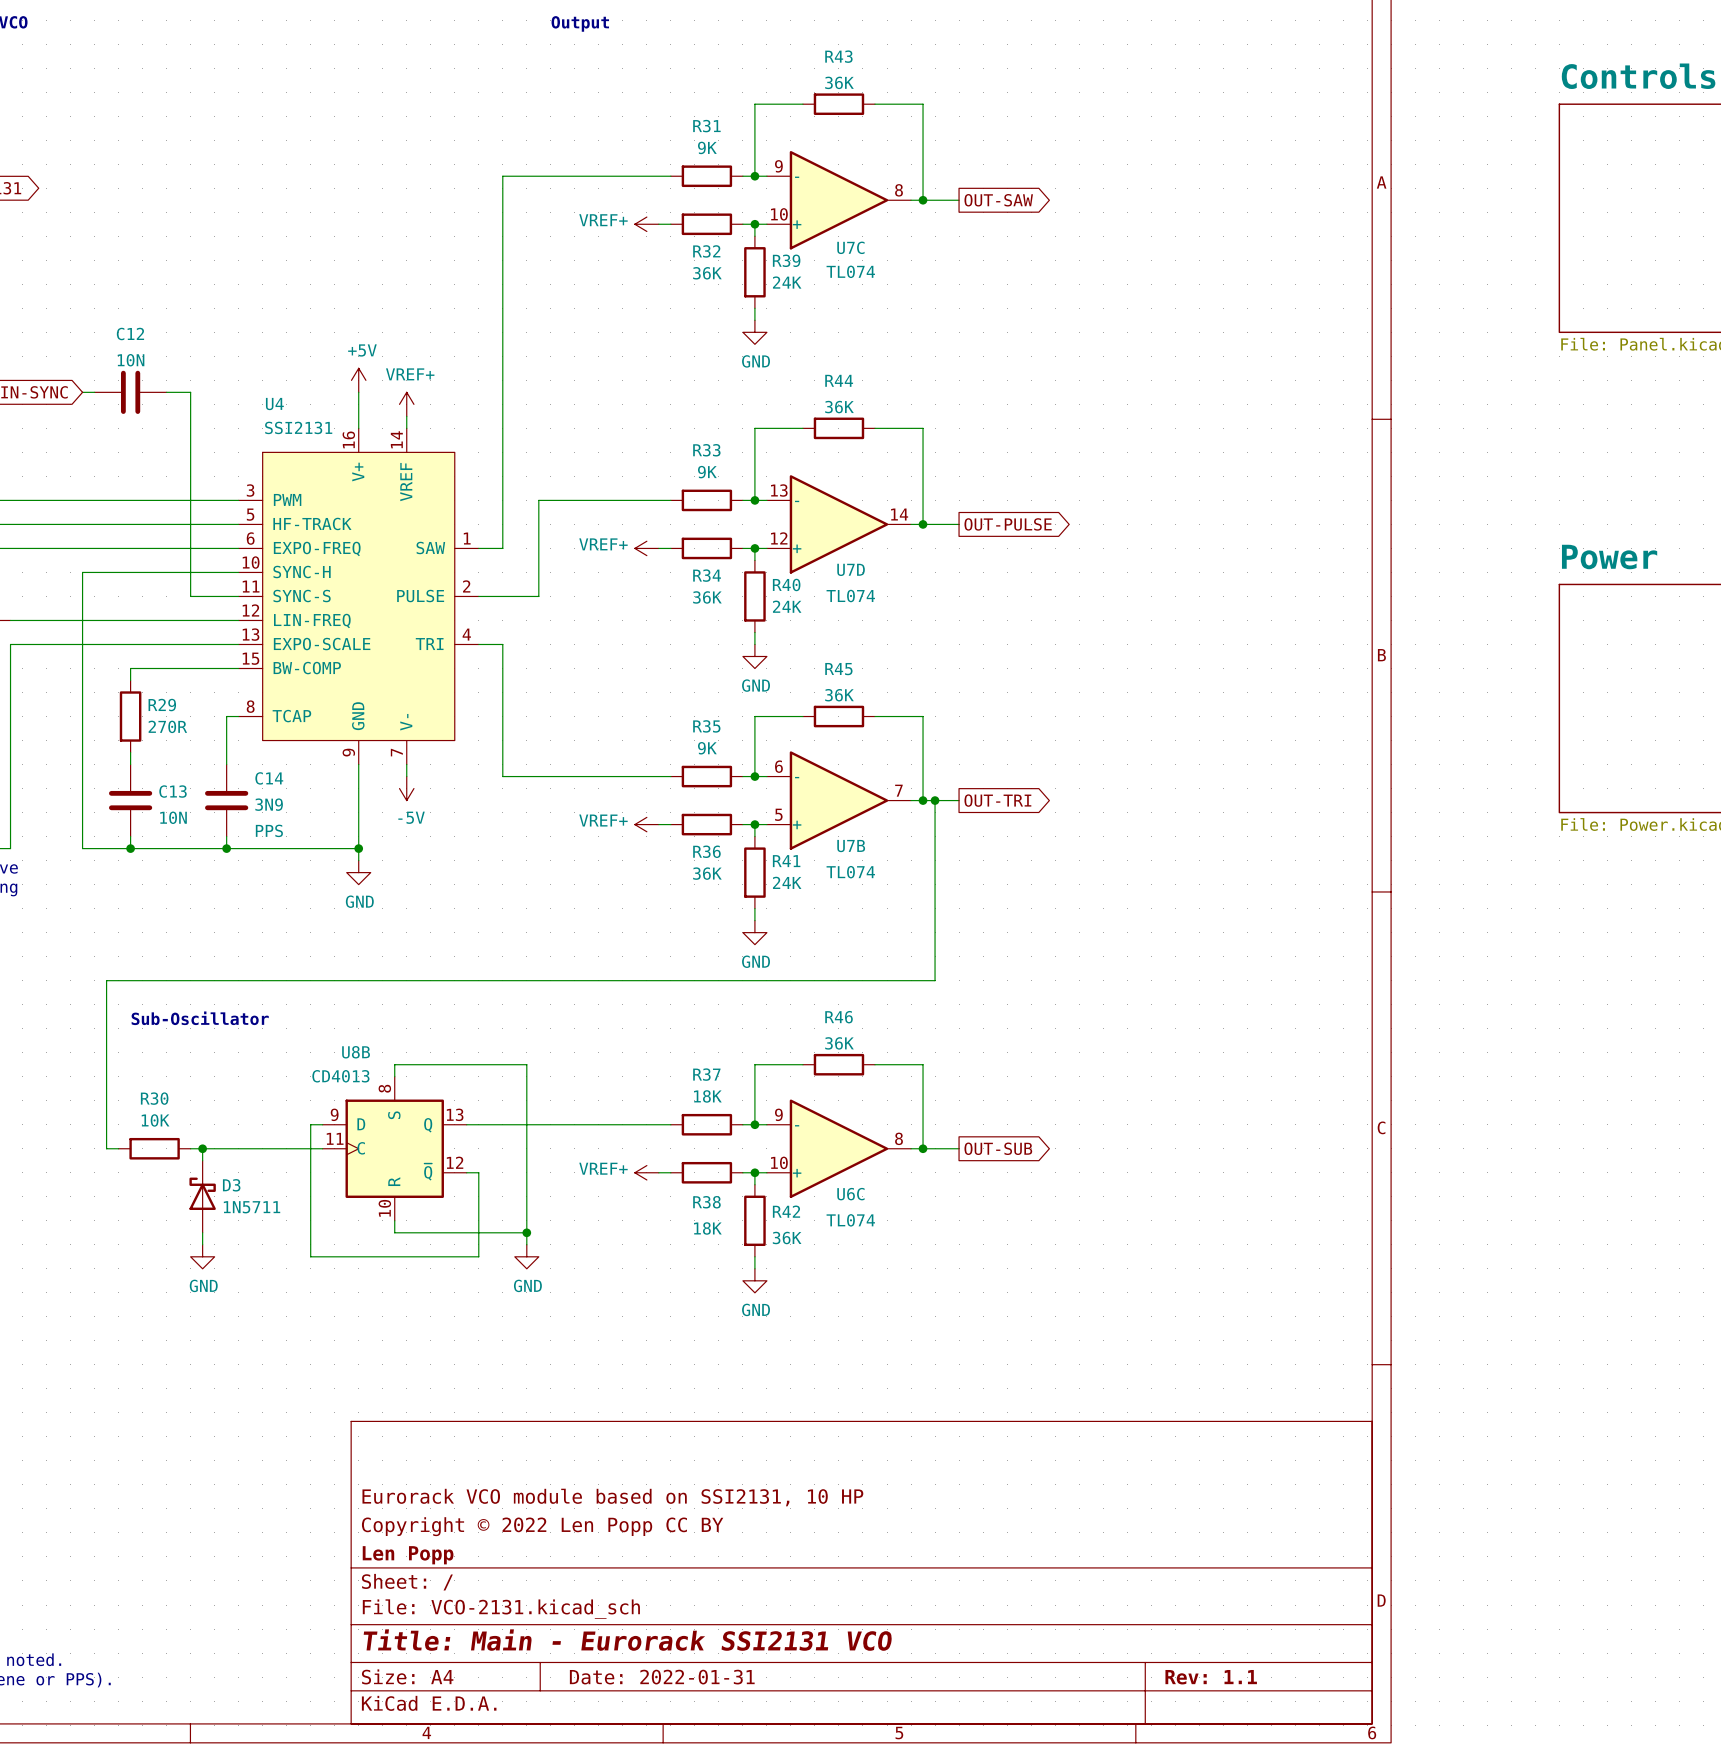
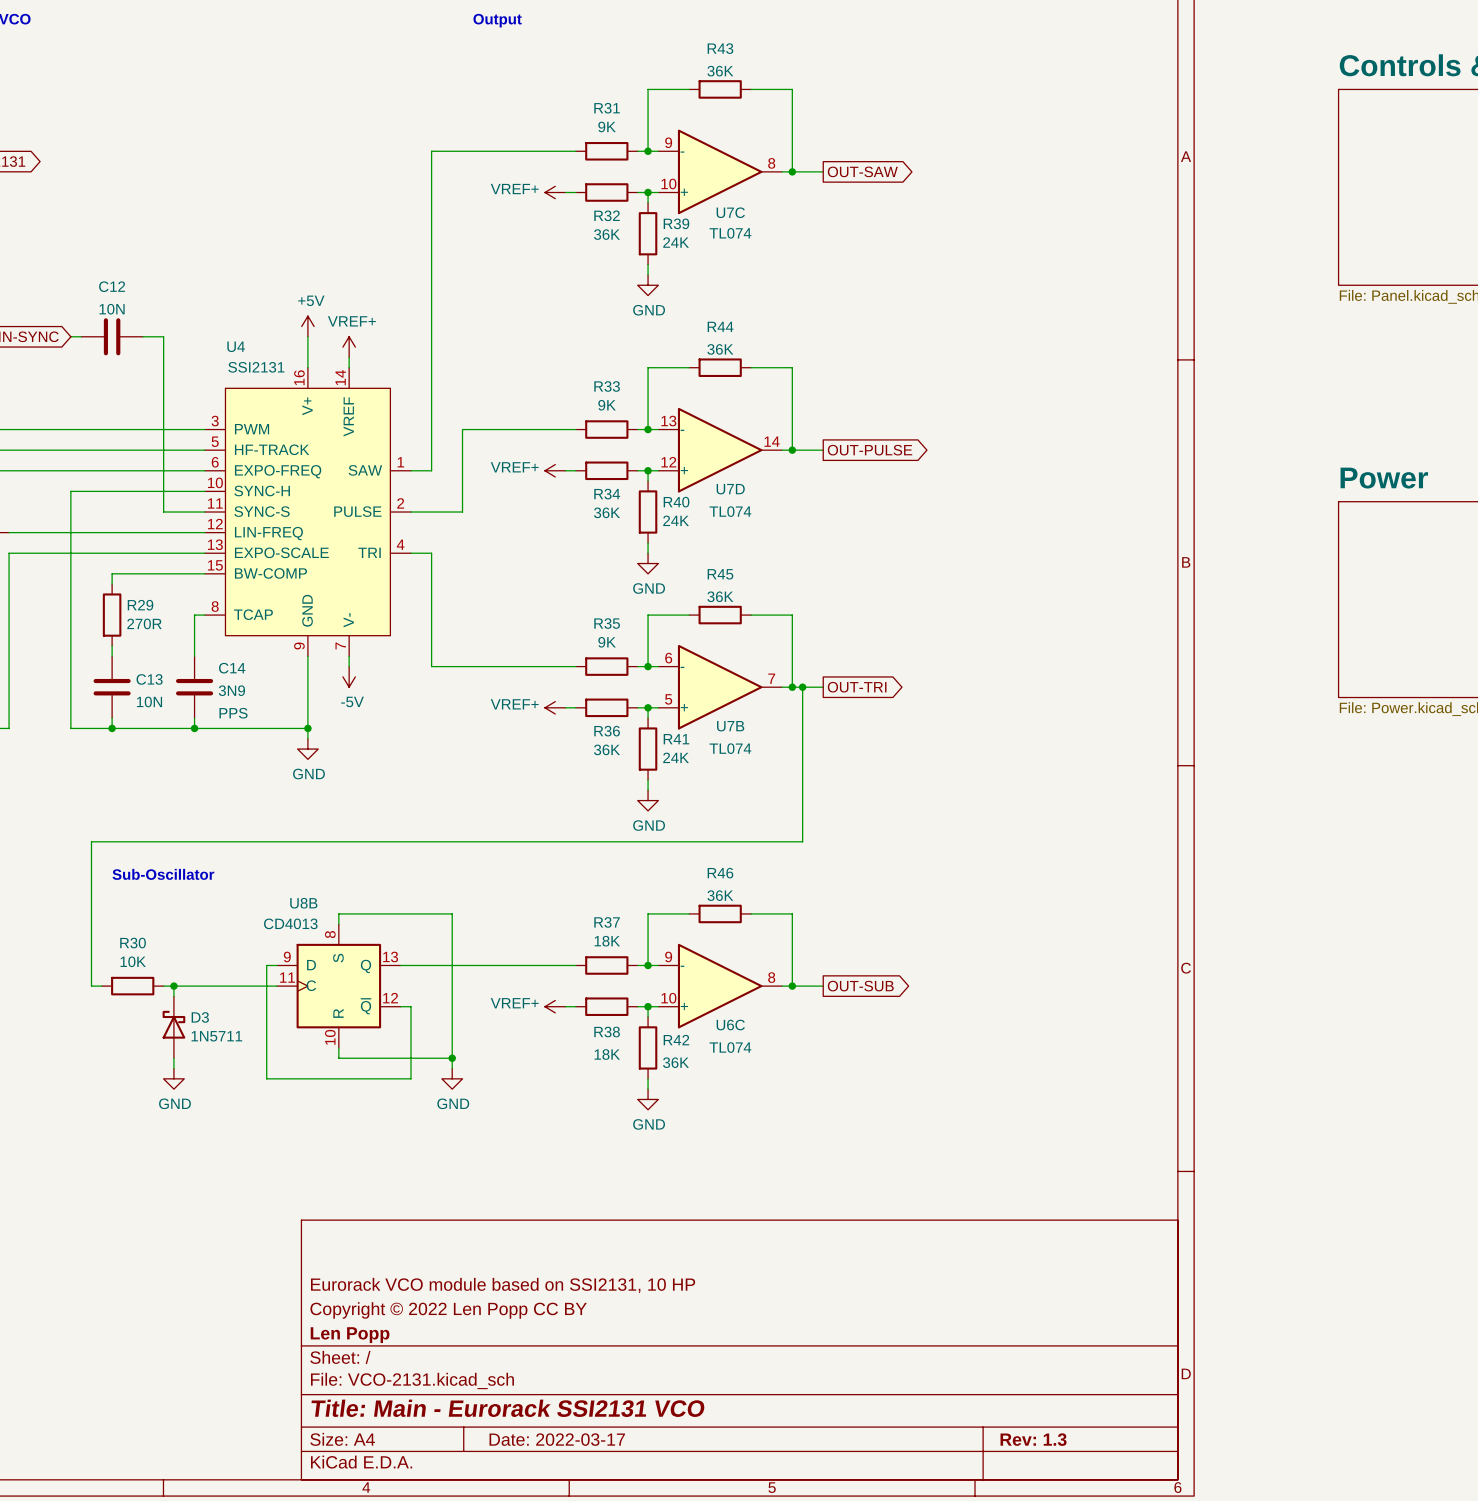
title block: Date: 2022-01-31 (662, 1677) -> Date: 2022-03-17 (557, 1439)
title block: Rev: 1.1 (1211, 1677) -> Rev: 1.3 (1033, 1439)

